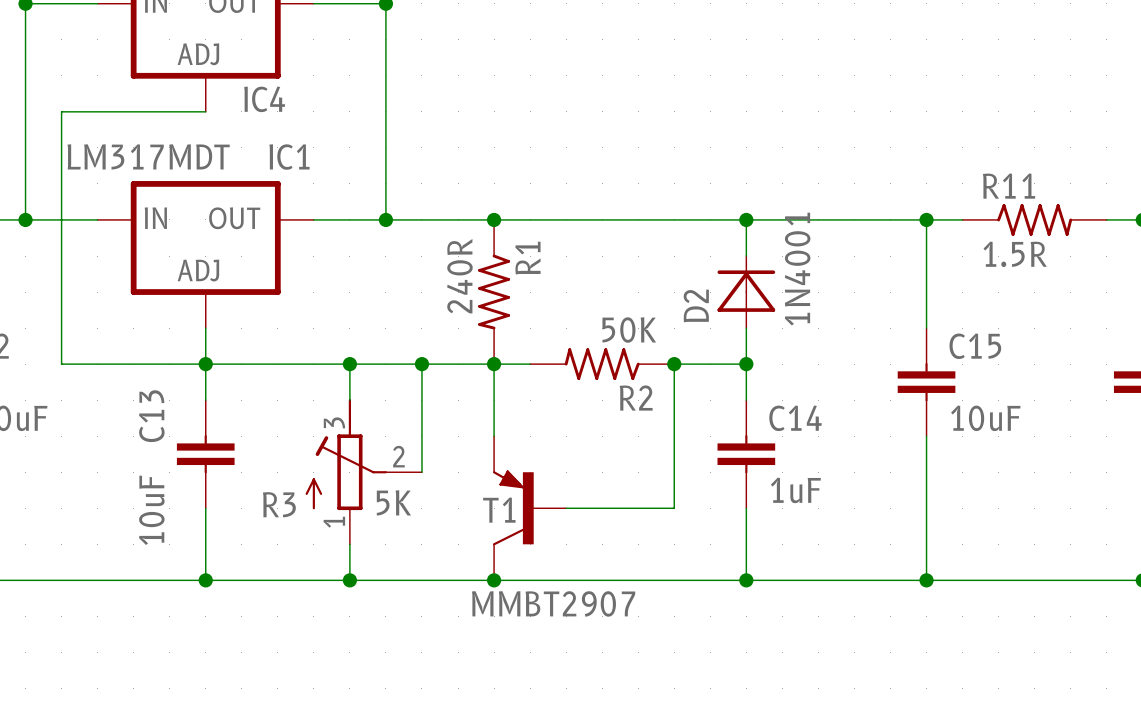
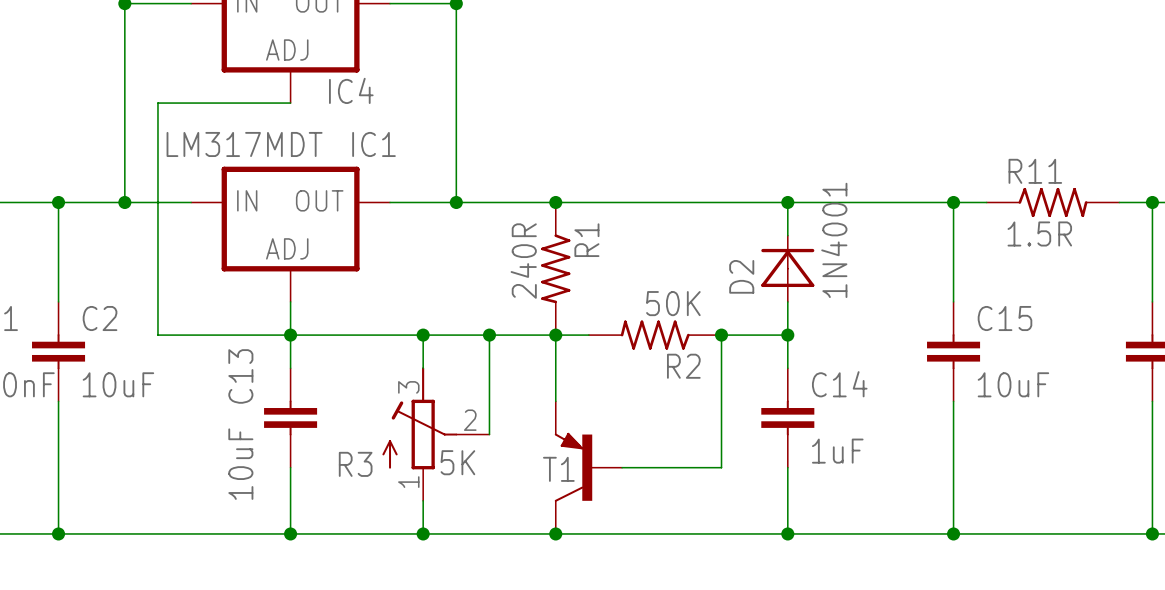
T1 value: MMBT2907 (553, 603) -> none

